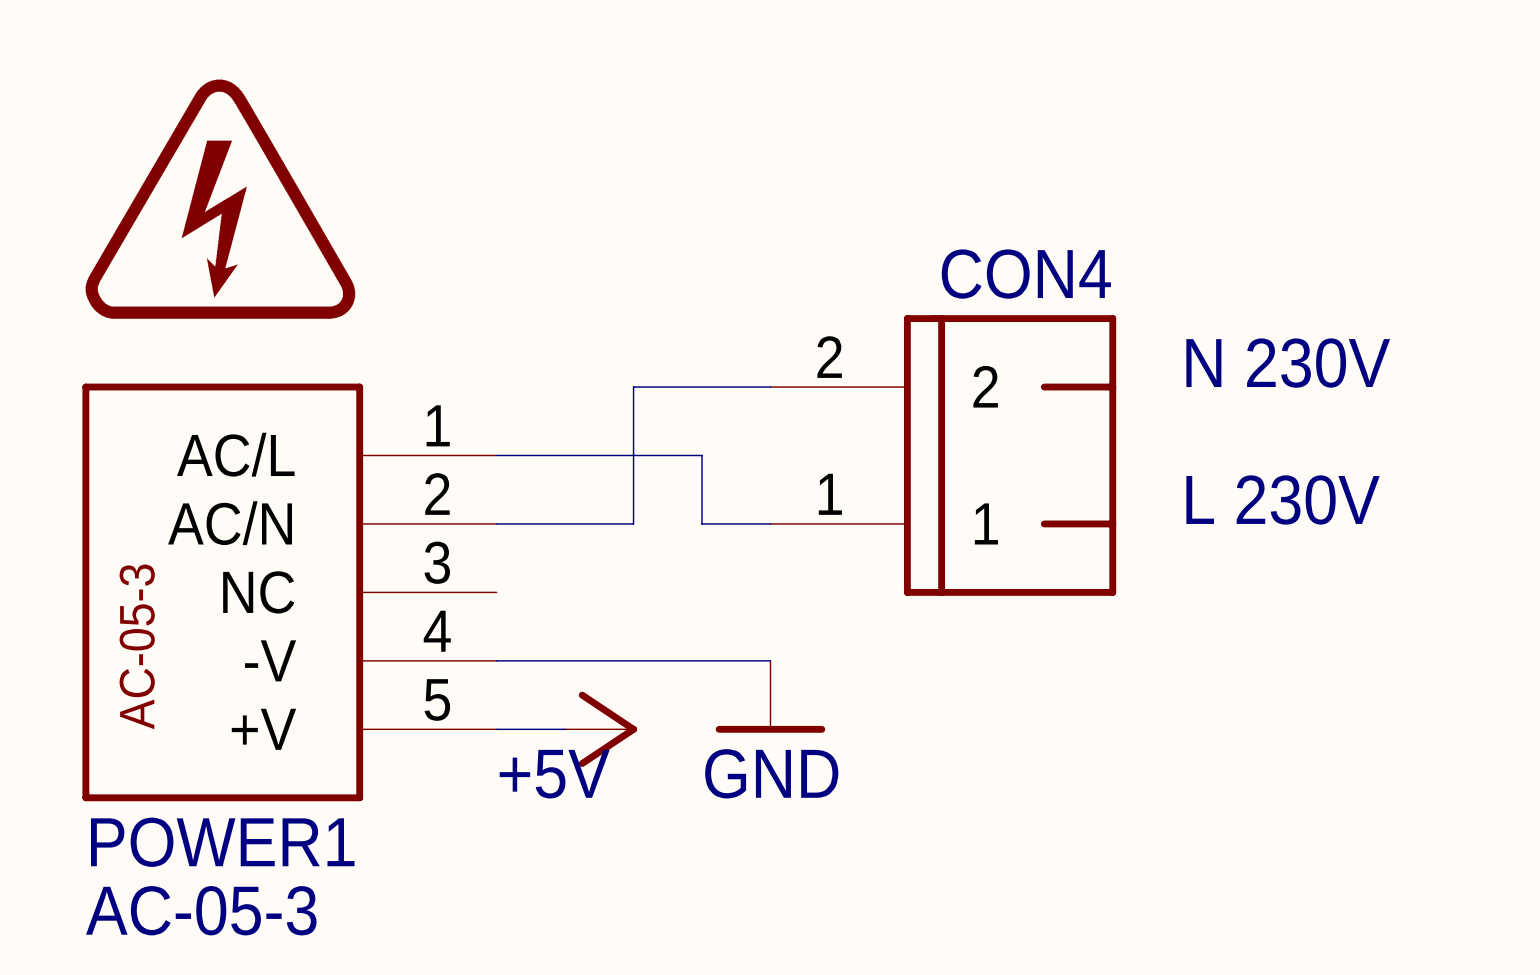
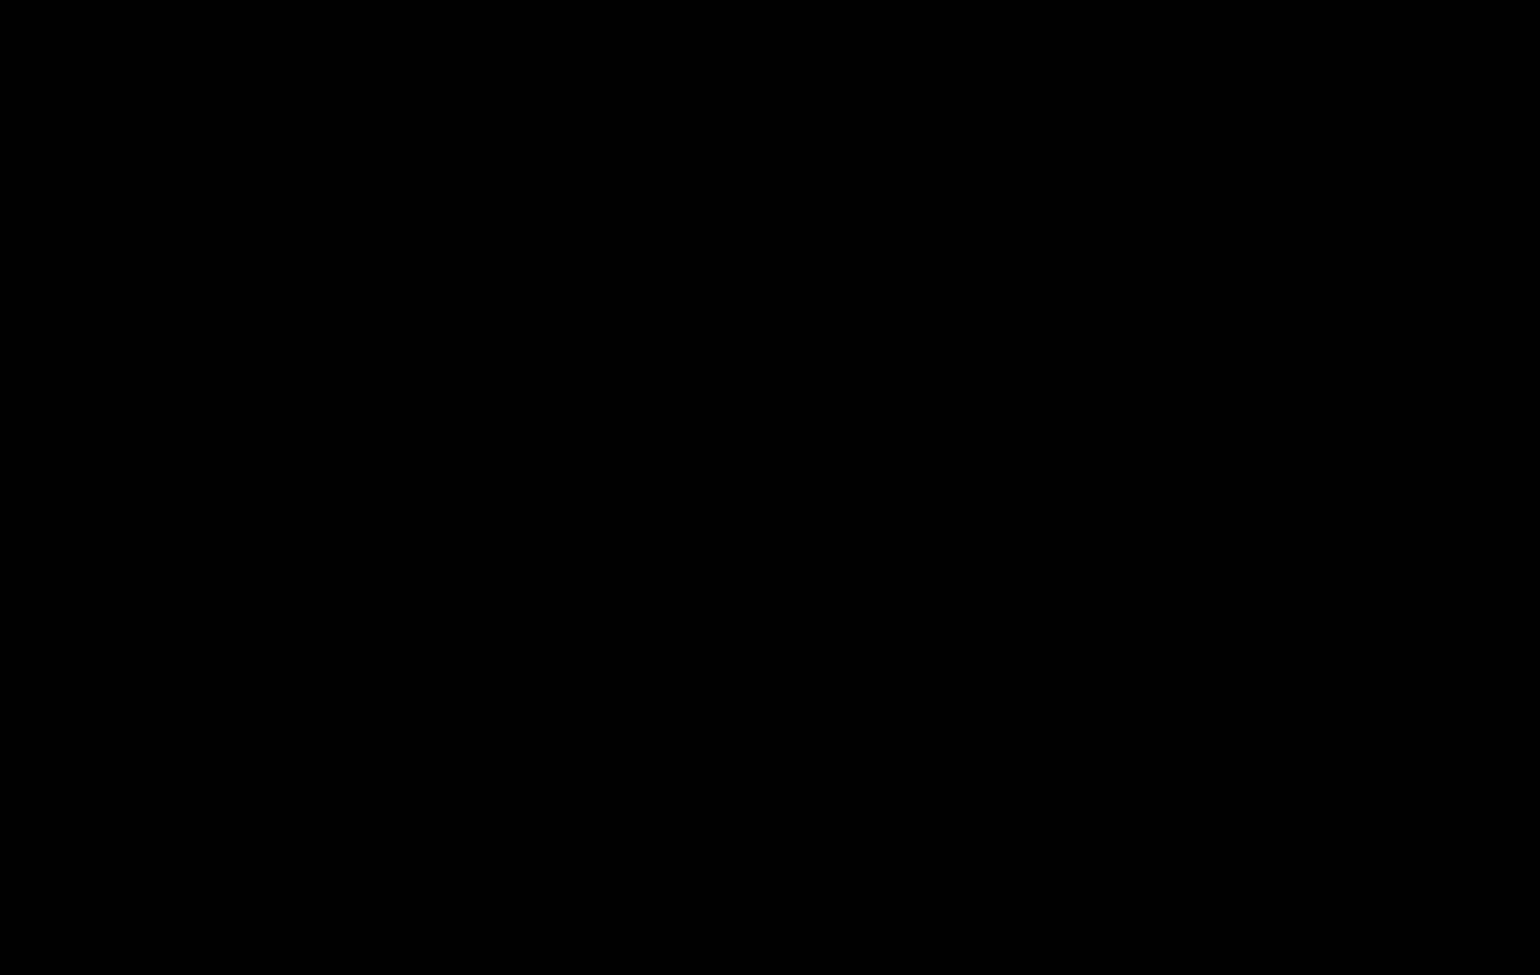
part: (220, 199) -> none
text: N 230V (1288, 363) -> none
wire: (770, 387) (633, 387) (633, 523) (496, 523) -> none
wire: (496, 455) (702, 455) (702, 523) (770, 523) -> none
CON4: (943, 455) -> none
text: L 230V (1283, 499) -> none
POWER1: AC-05-3 (289, 592) -> none
wire: (496, 660) (770, 660) -> none
power symbol: GND (770, 696) -> none
wire: (496, 729) (565, 729) -> none
power symbol: +5V (601, 729) -> none

